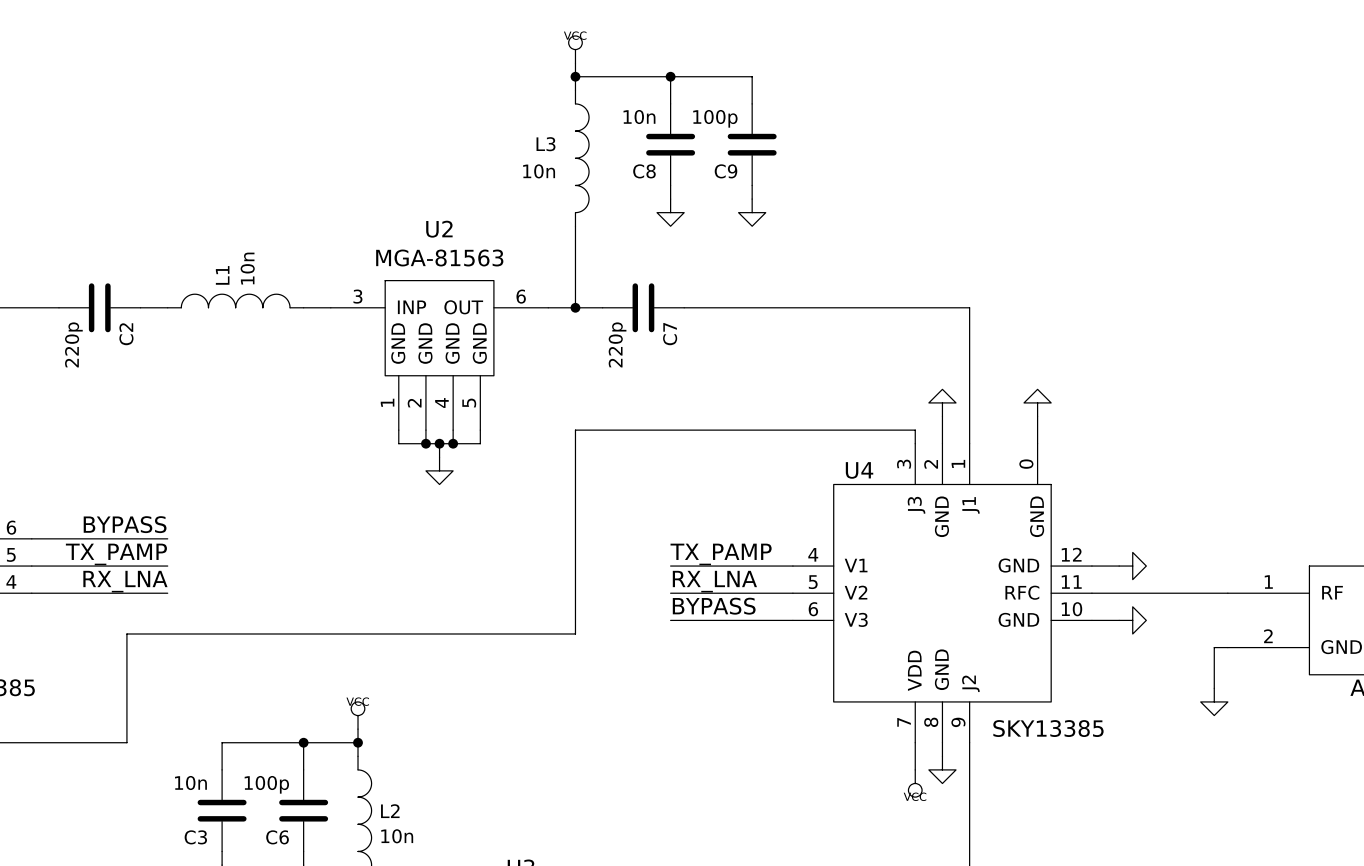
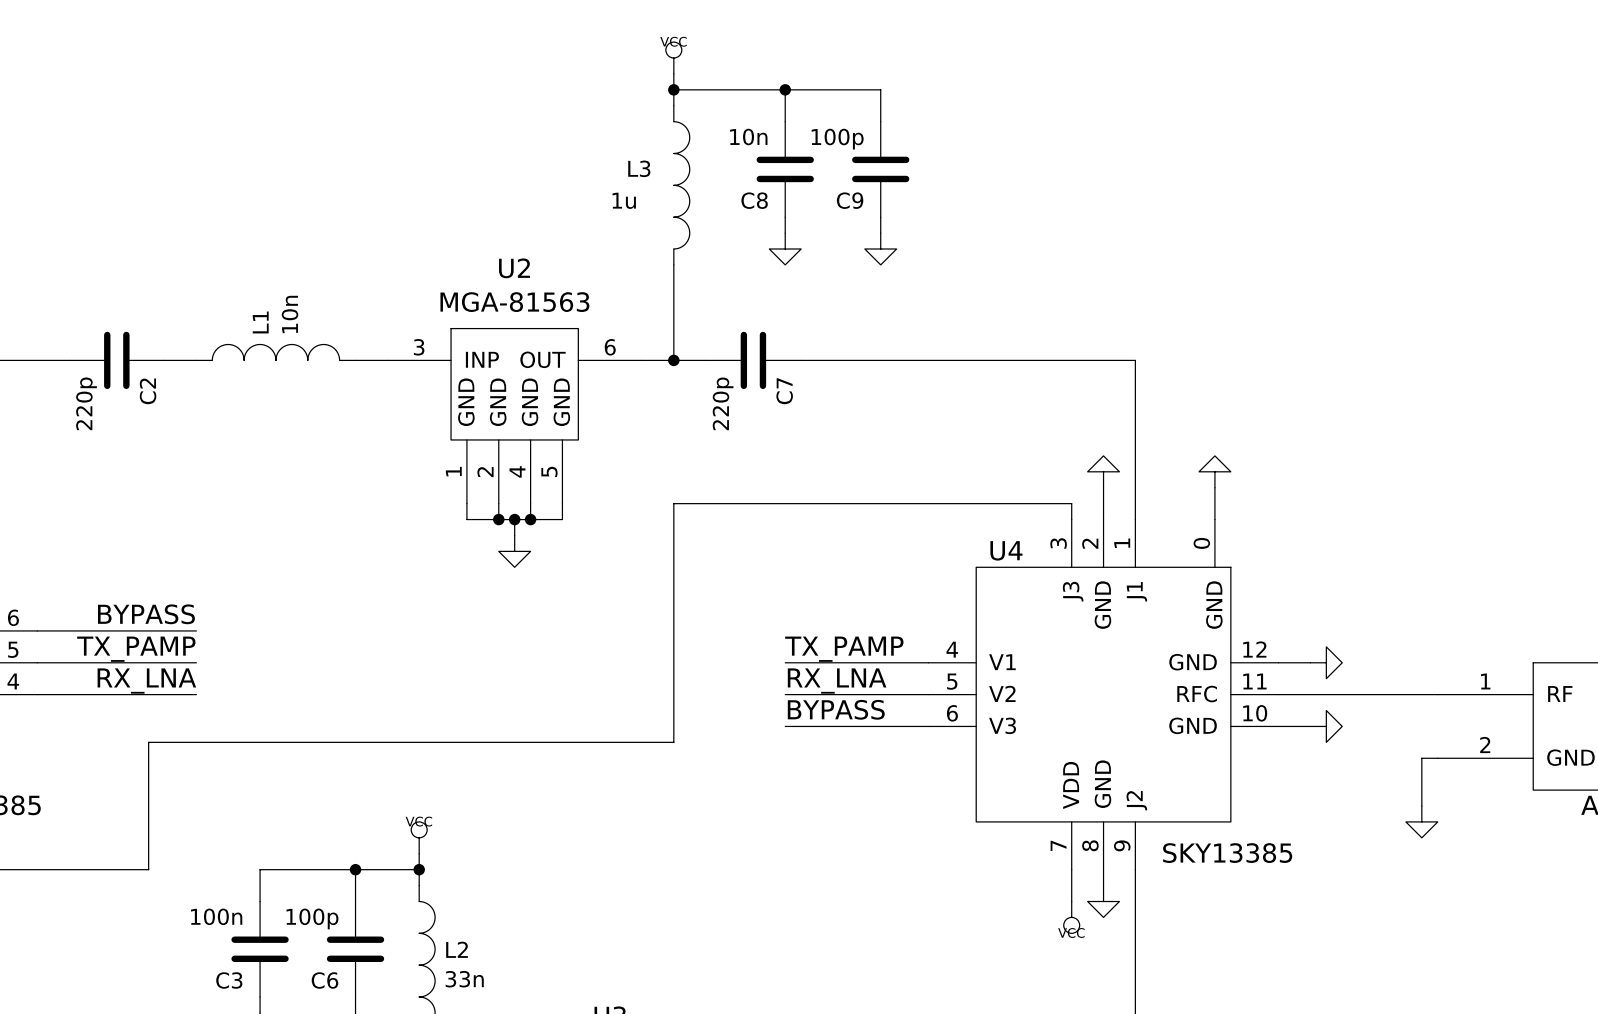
L3 value: 10n (539, 171) -> 1u (624, 200)
C3 value: 10n (190, 783) -> 100n (216, 916)
L2 value: 10n (397, 836) -> 33n (464, 979)

